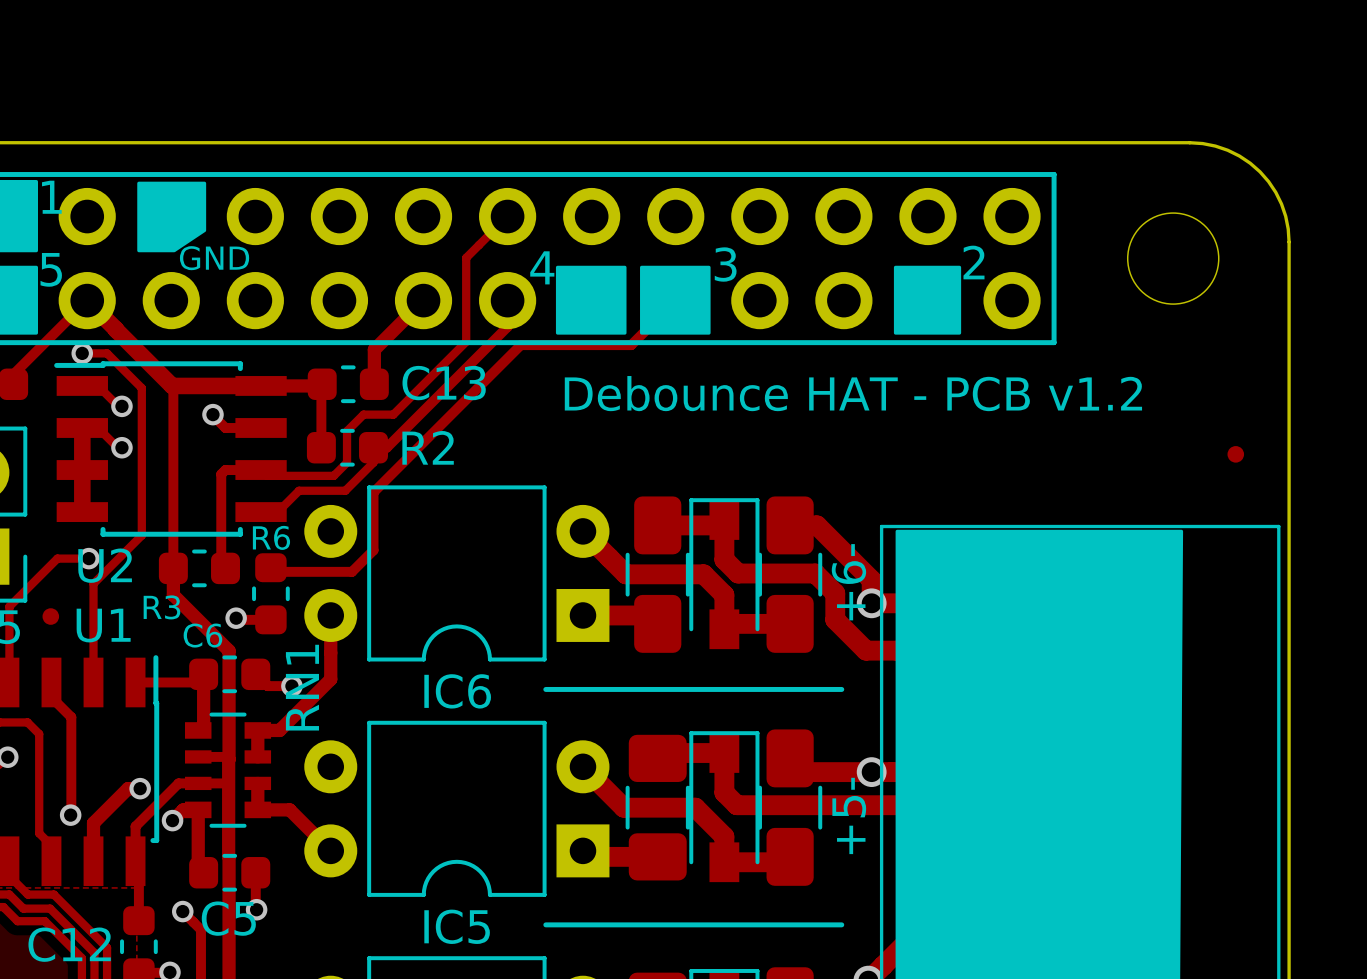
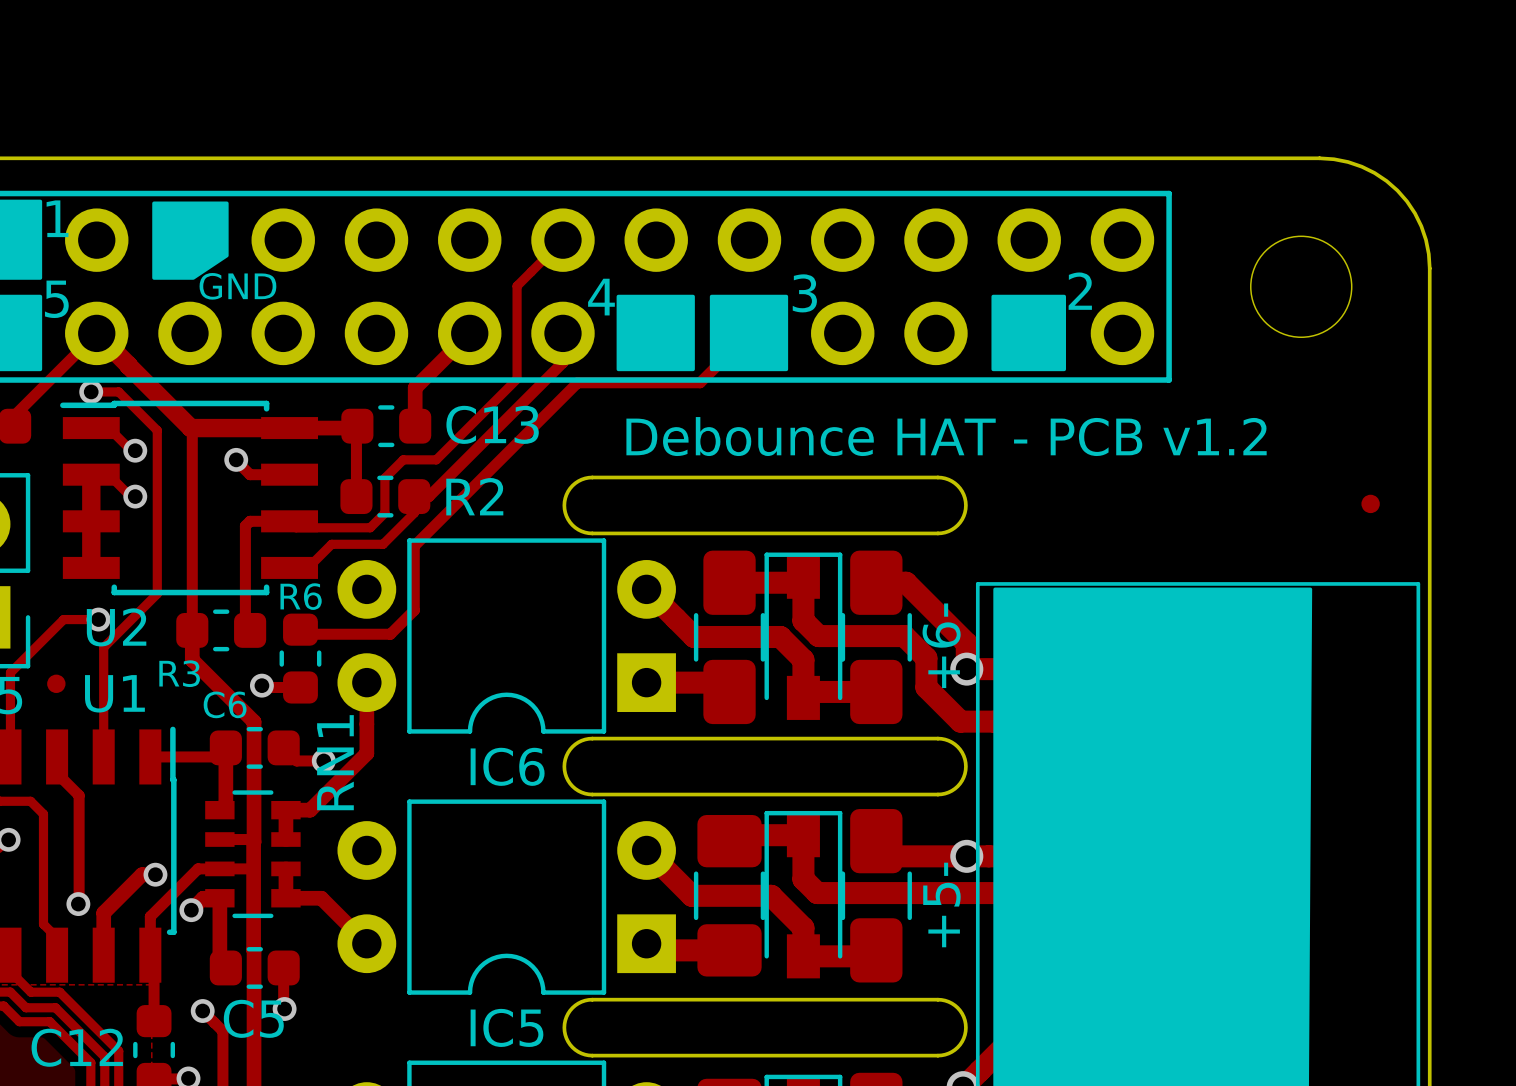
board edge: none -> (592, 477) (941, 477) (951, 481) (960, 488) (964, 498) (965, 509) (957, 525) (948, 531) (937, 533) (588, 533) (572, 525) (566, 516) (564, 505) (566, 494) (572, 485) (581, 479) (592, 477)
board edge: none -> (592, 738) (941, 738) (951, 742) (960, 749) (964, 759) (965, 770) (957, 786) (948, 792) (937, 794) (588, 794) (572, 786) (566, 777) (564, 766) (566, 755) (572, 746) (581, 740) (592, 738)
line: (545, 689) (841, 689) -> none
board edge: none -> (592, 999) (941, 999) (951, 1003) (960, 1010) (964, 1020) (965, 1031) (957, 1047) (948, 1053) (937, 1055) (588, 1055) (572, 1047) (566, 1038) (564, 1027) (566, 1016) (572, 1007) (581, 1001) (592, 999)
line: (545, 924) (841, 924) -> none

